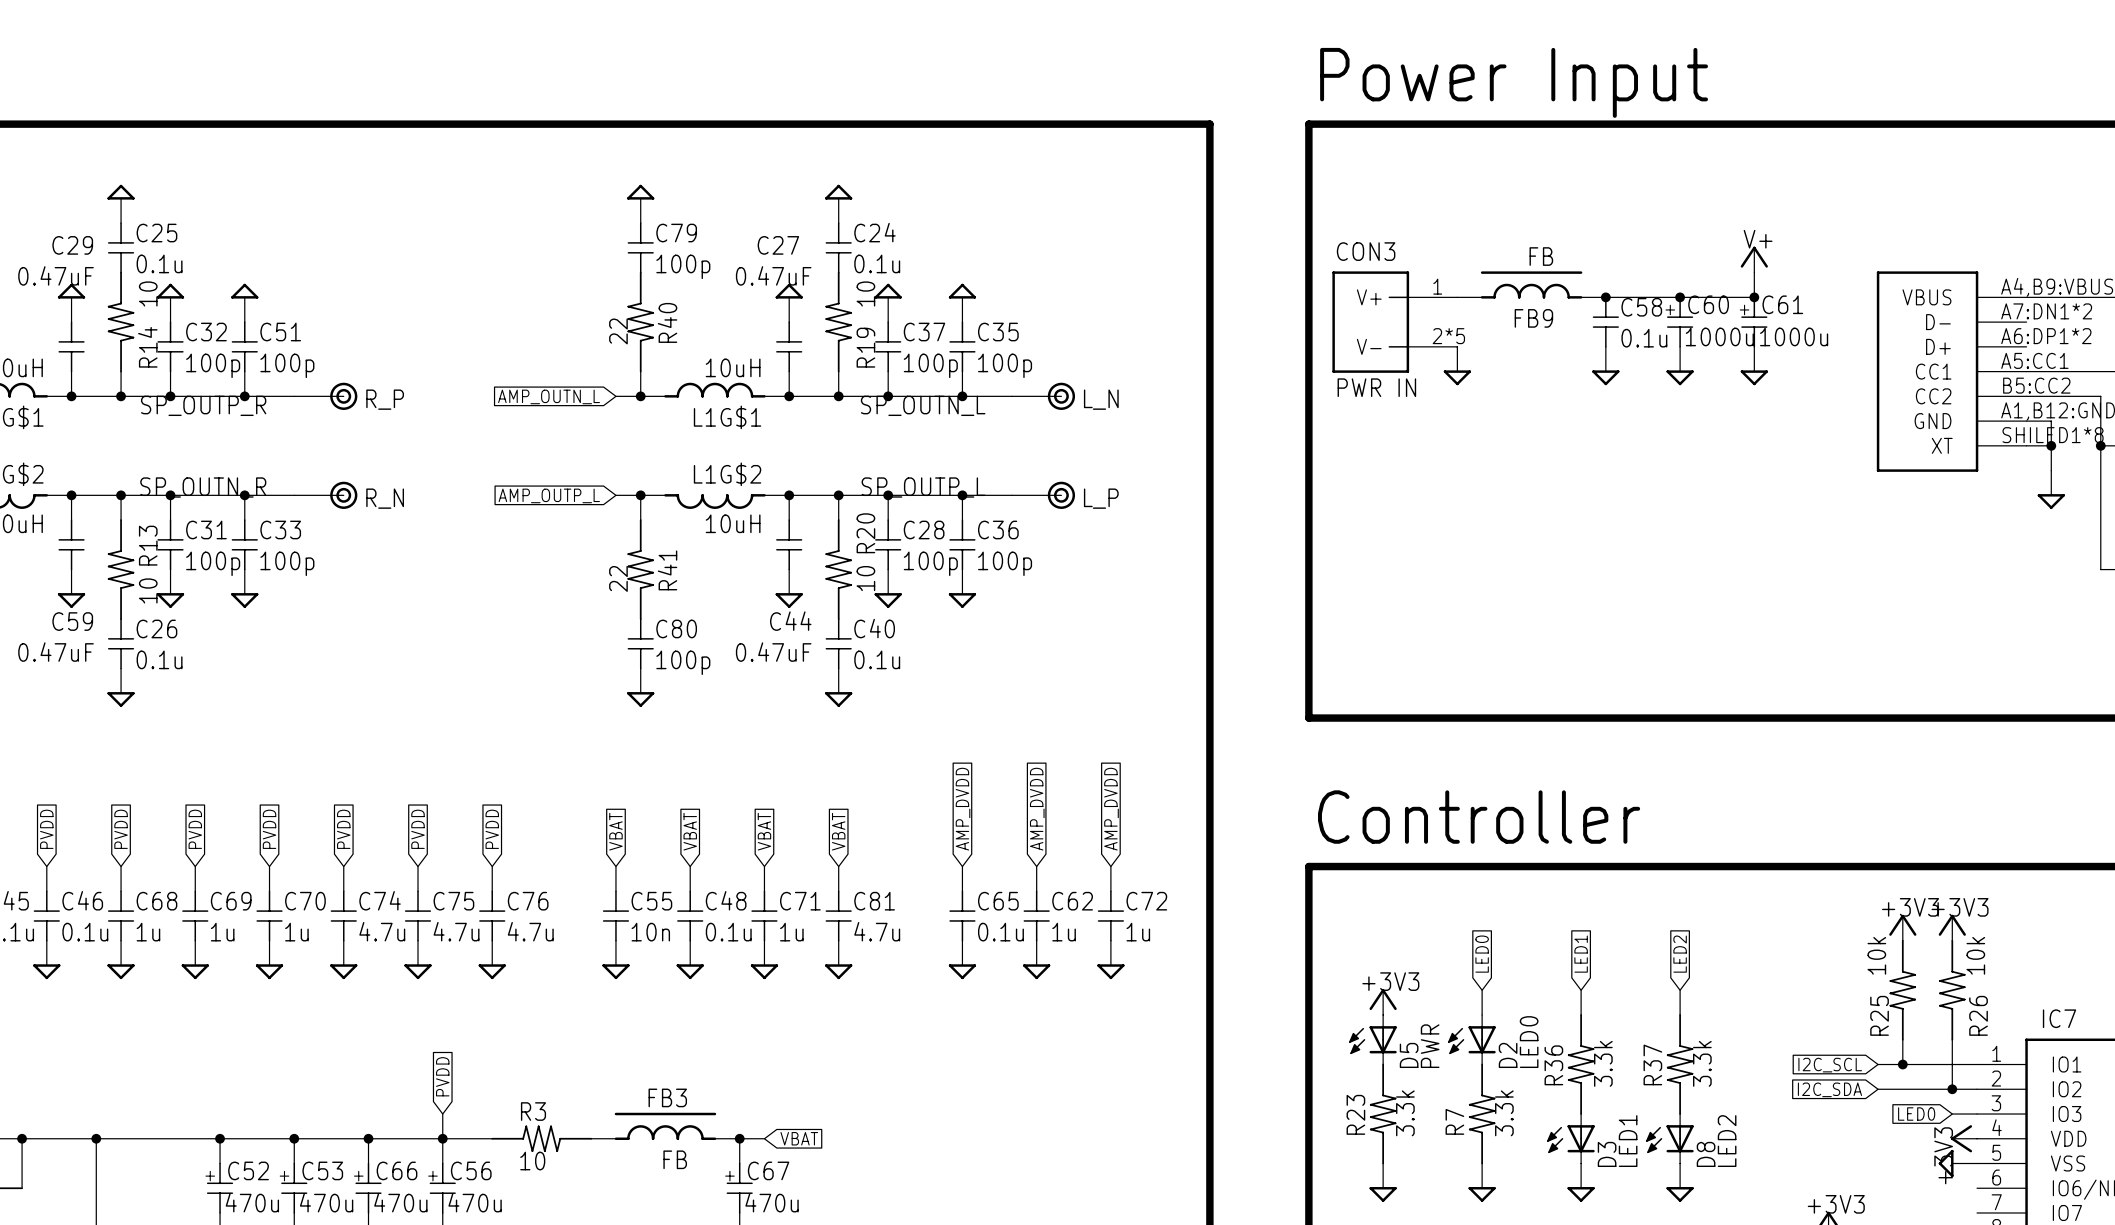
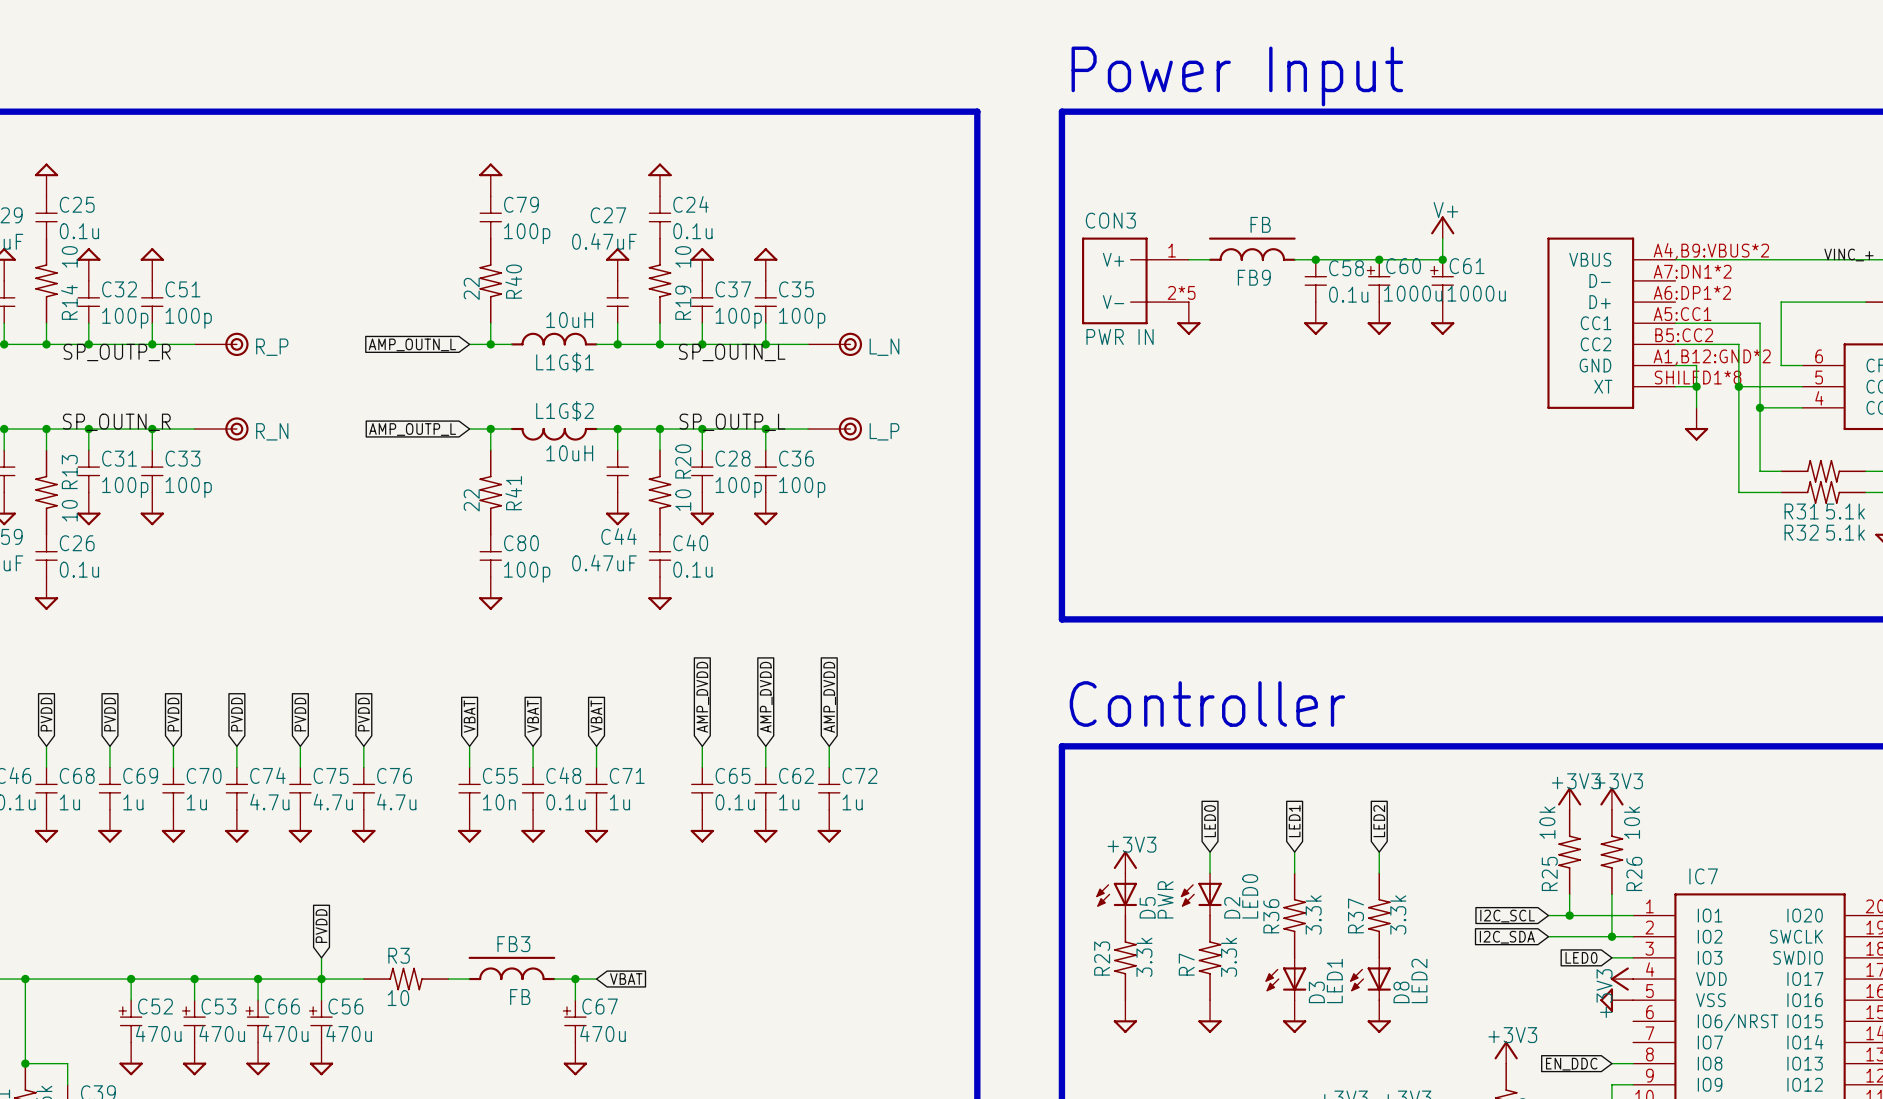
global label position: AMP_DVDD (1111, 809) -> AMP_DVDD (702, 697)
global label: VBAT (838, 831) -> none
wire: (838, 866) (838, 891) -> (702, 746) (702, 767)
wire: (1110, 866) (1110, 891) -> none
C65 name: C65 (998, 901) -> C62 (796, 775)
C62 name: C62 (1072, 901) -> C72 (859, 775)
C81: 4.7u (838, 916) -> none
C65: none -> 0.1u (702, 788)
C72: 1u (1110, 916) -> none
C65 value: 0.1u (1000, 932) -> 1u (789, 802)
power symbol position: (838, 959) -> (702, 826)
power symbol: (1110, 959) -> none

